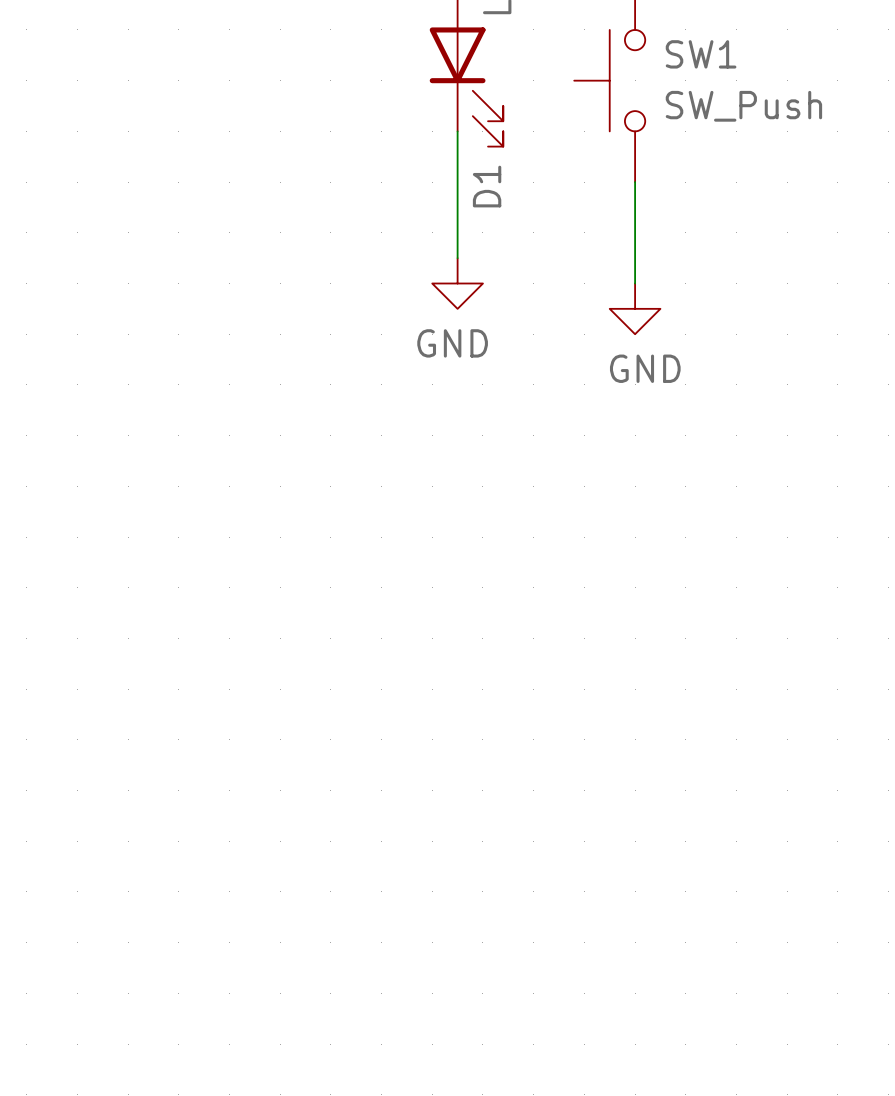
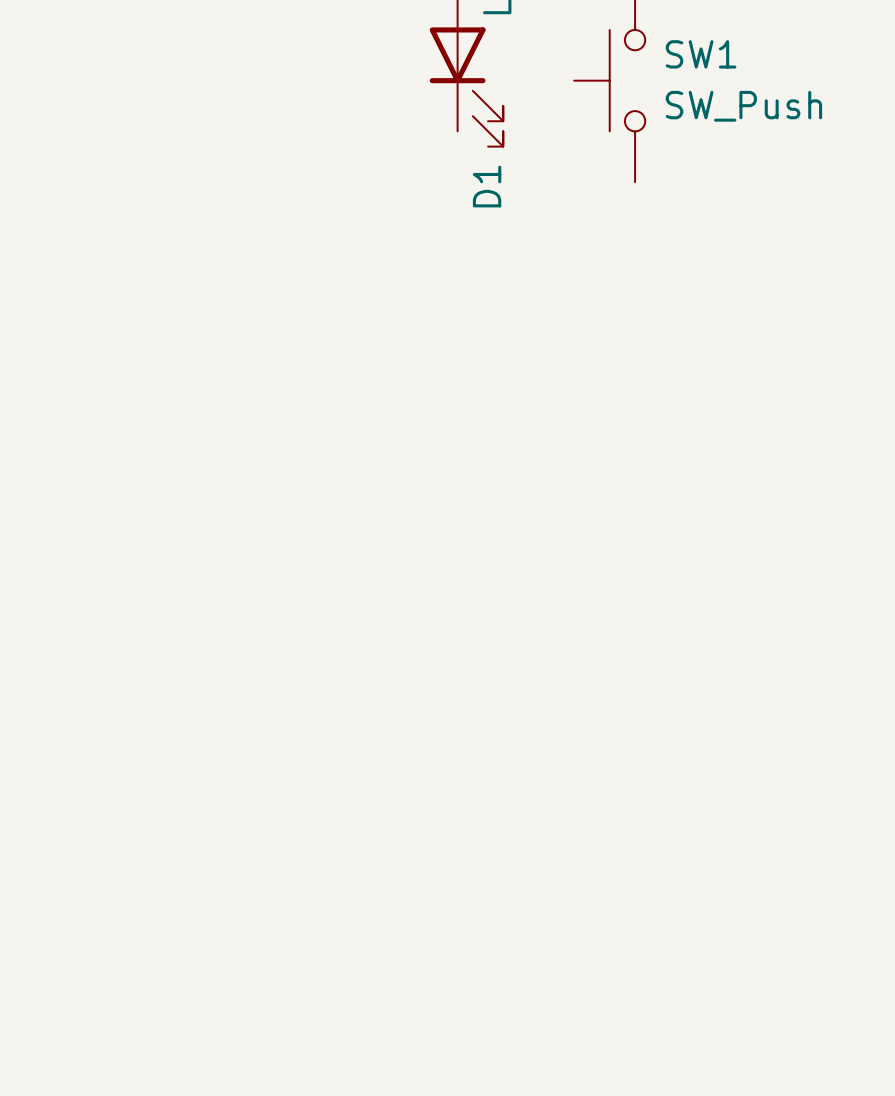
wire: (457, 131) (457, 258) -> none
wire: (635, 182) (635, 283) -> none
power symbol: GND (457, 283) -> none
power symbol: GND (635, 308) -> none

